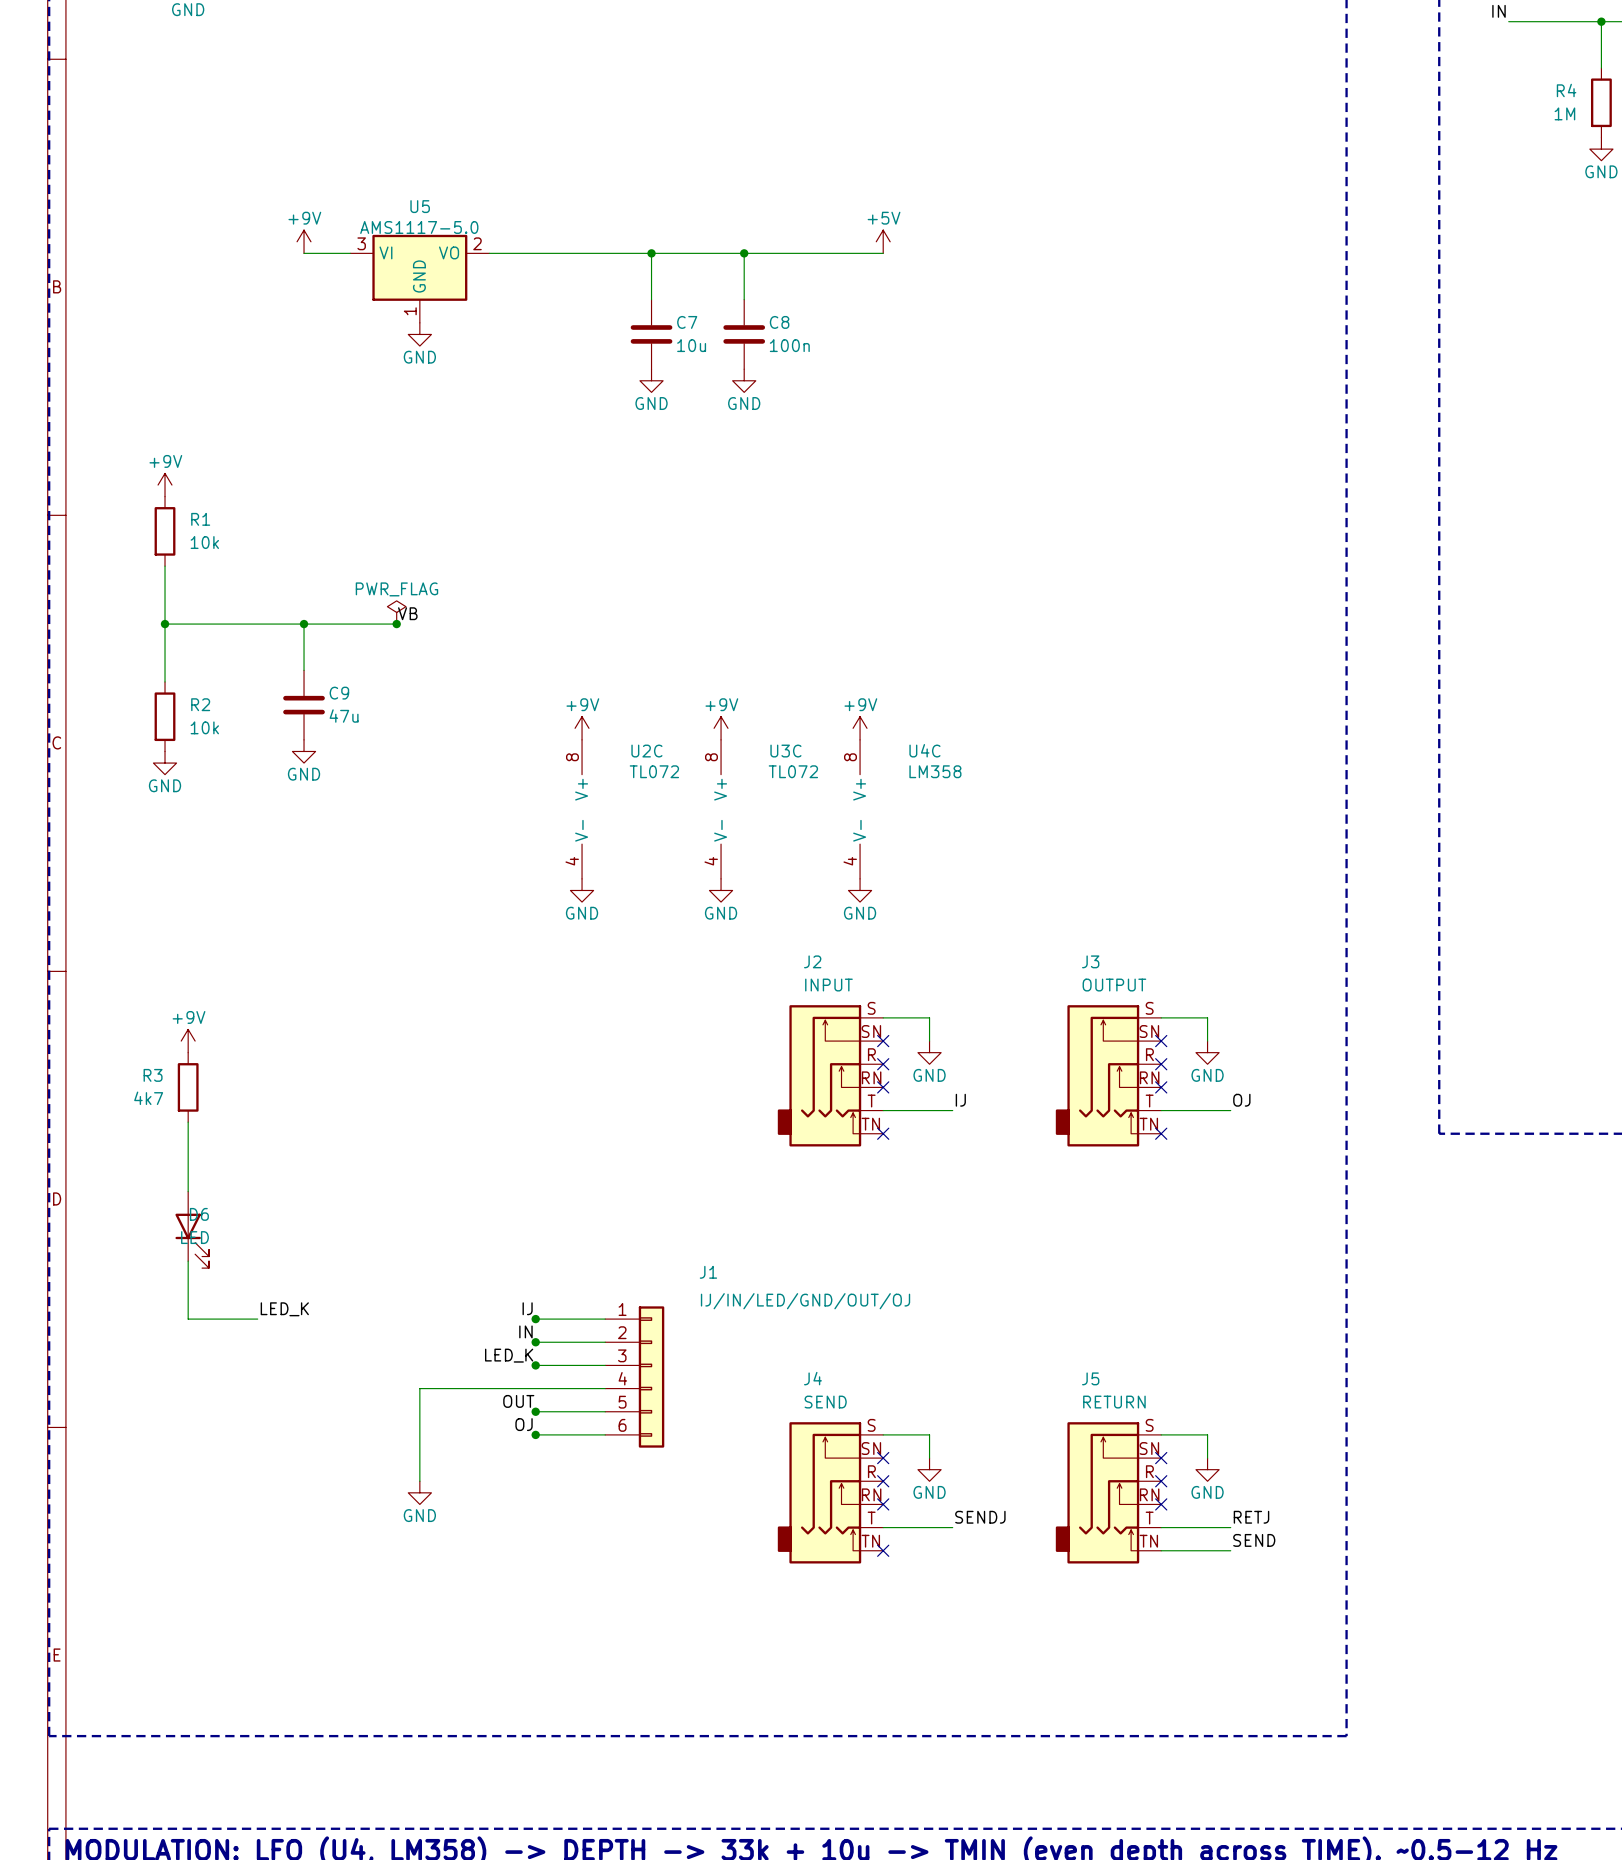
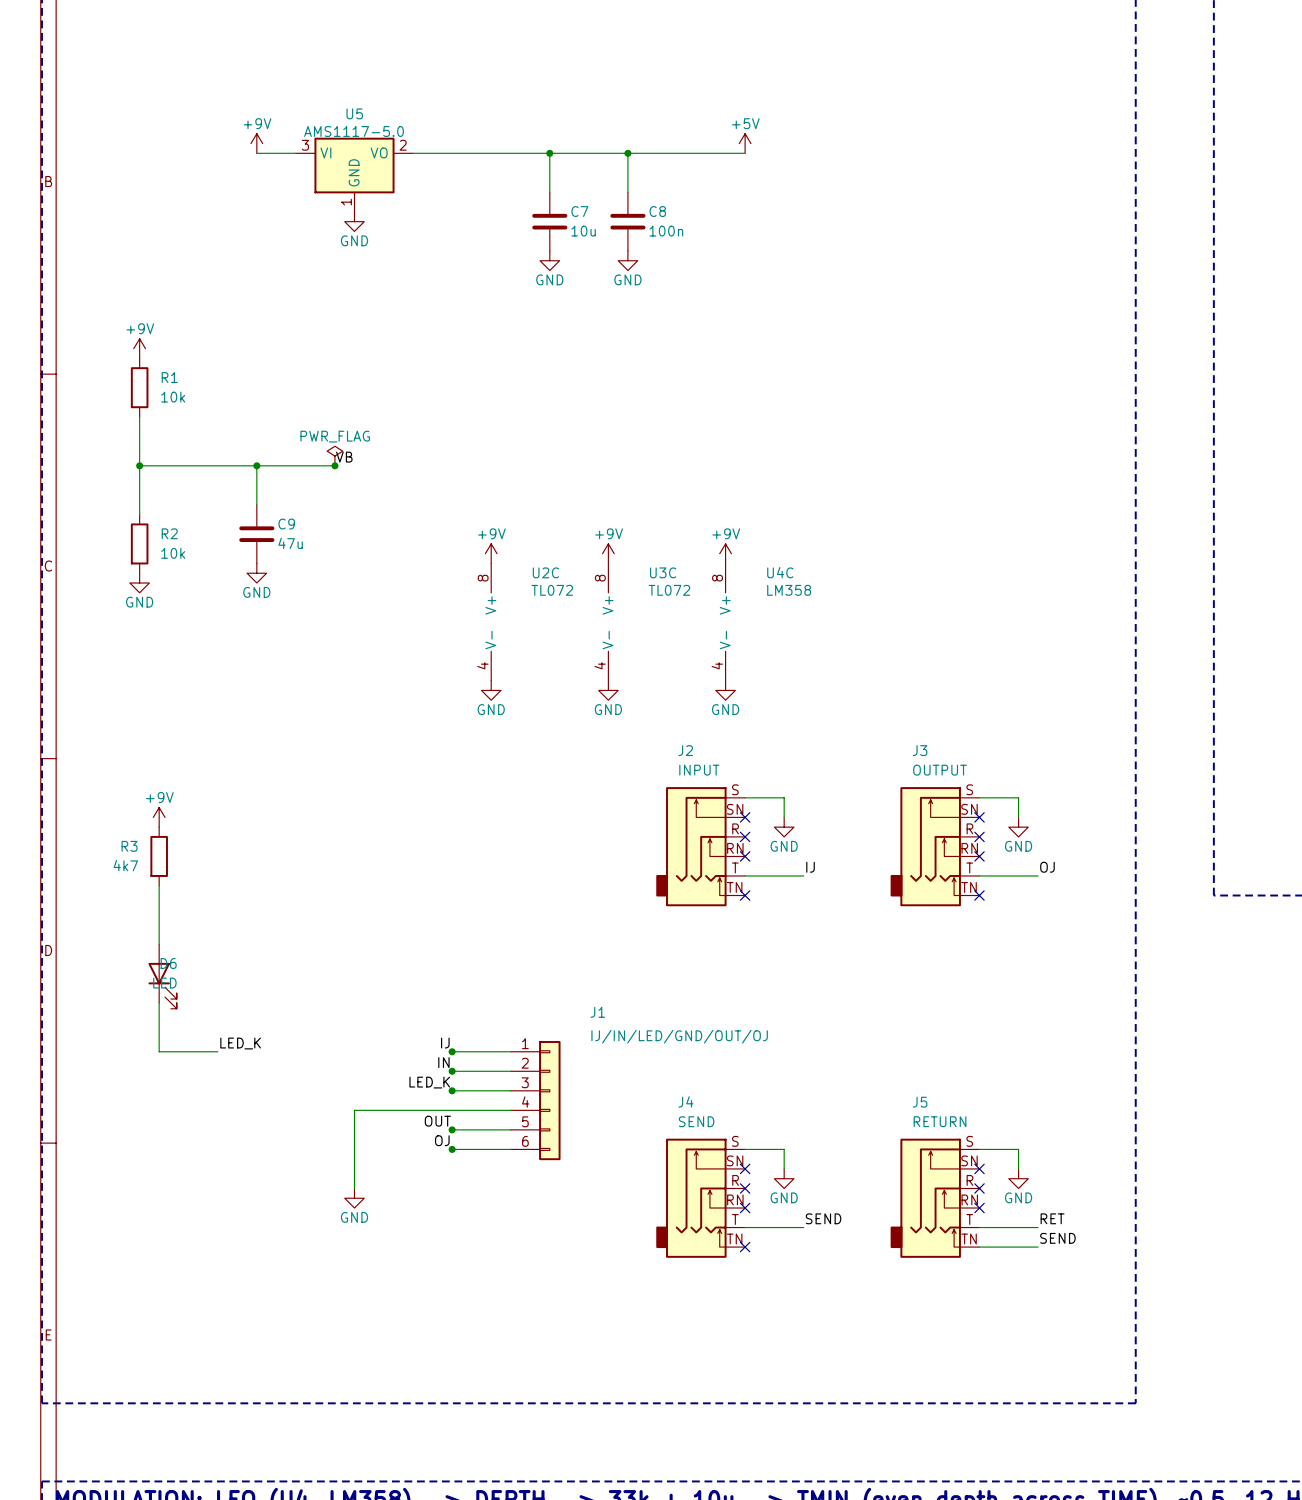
label: SENDJ (980, 1517) -> SEND (823, 1218)
label: RETJ (1251, 1517) -> RET (1052, 1218)

